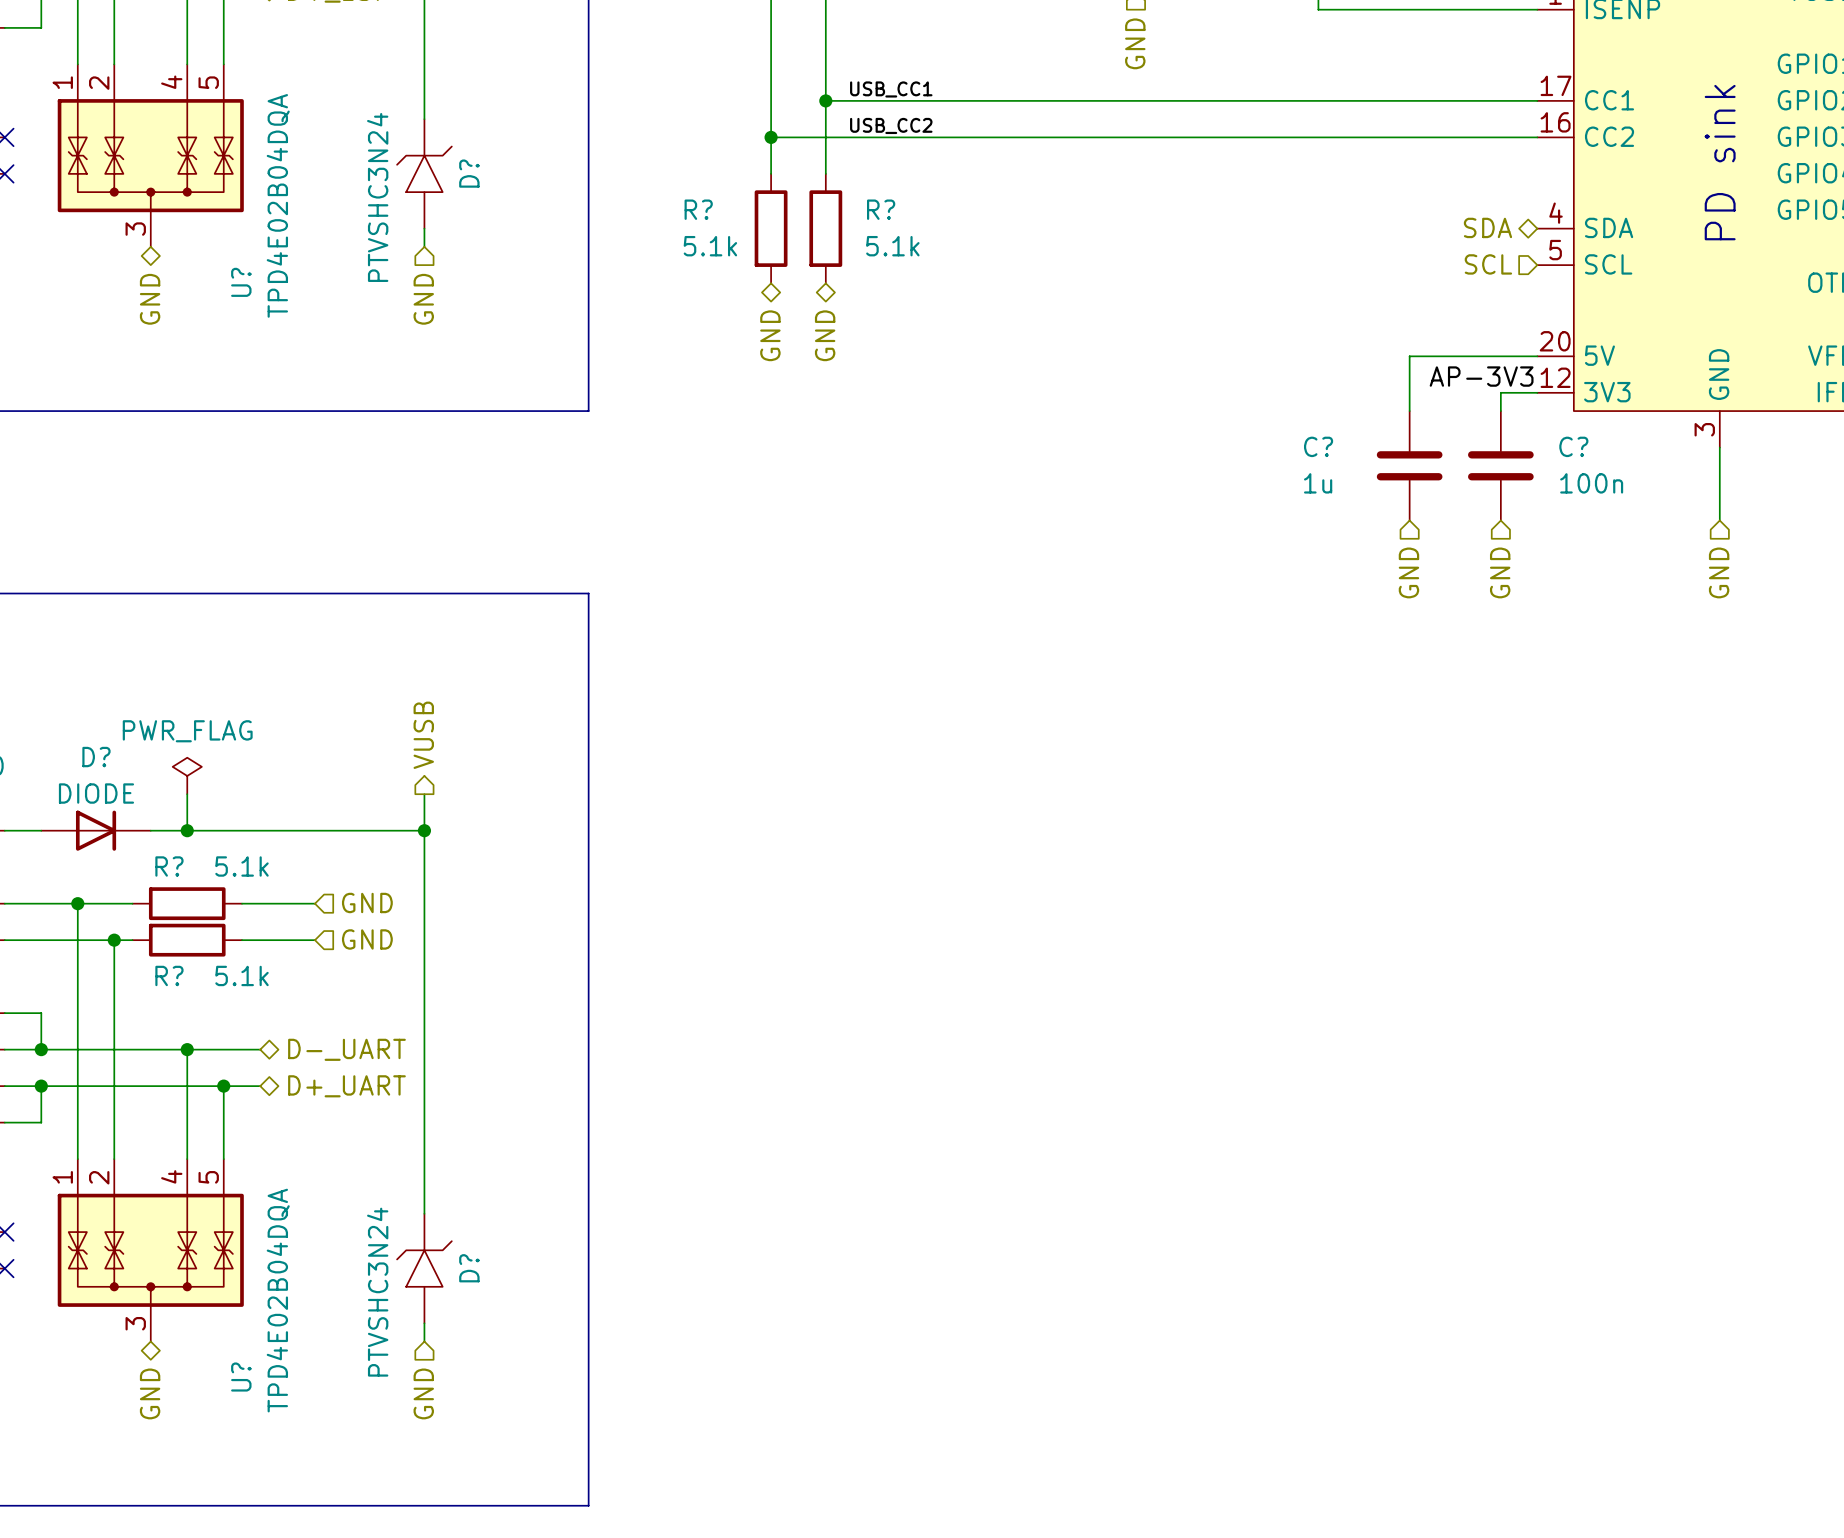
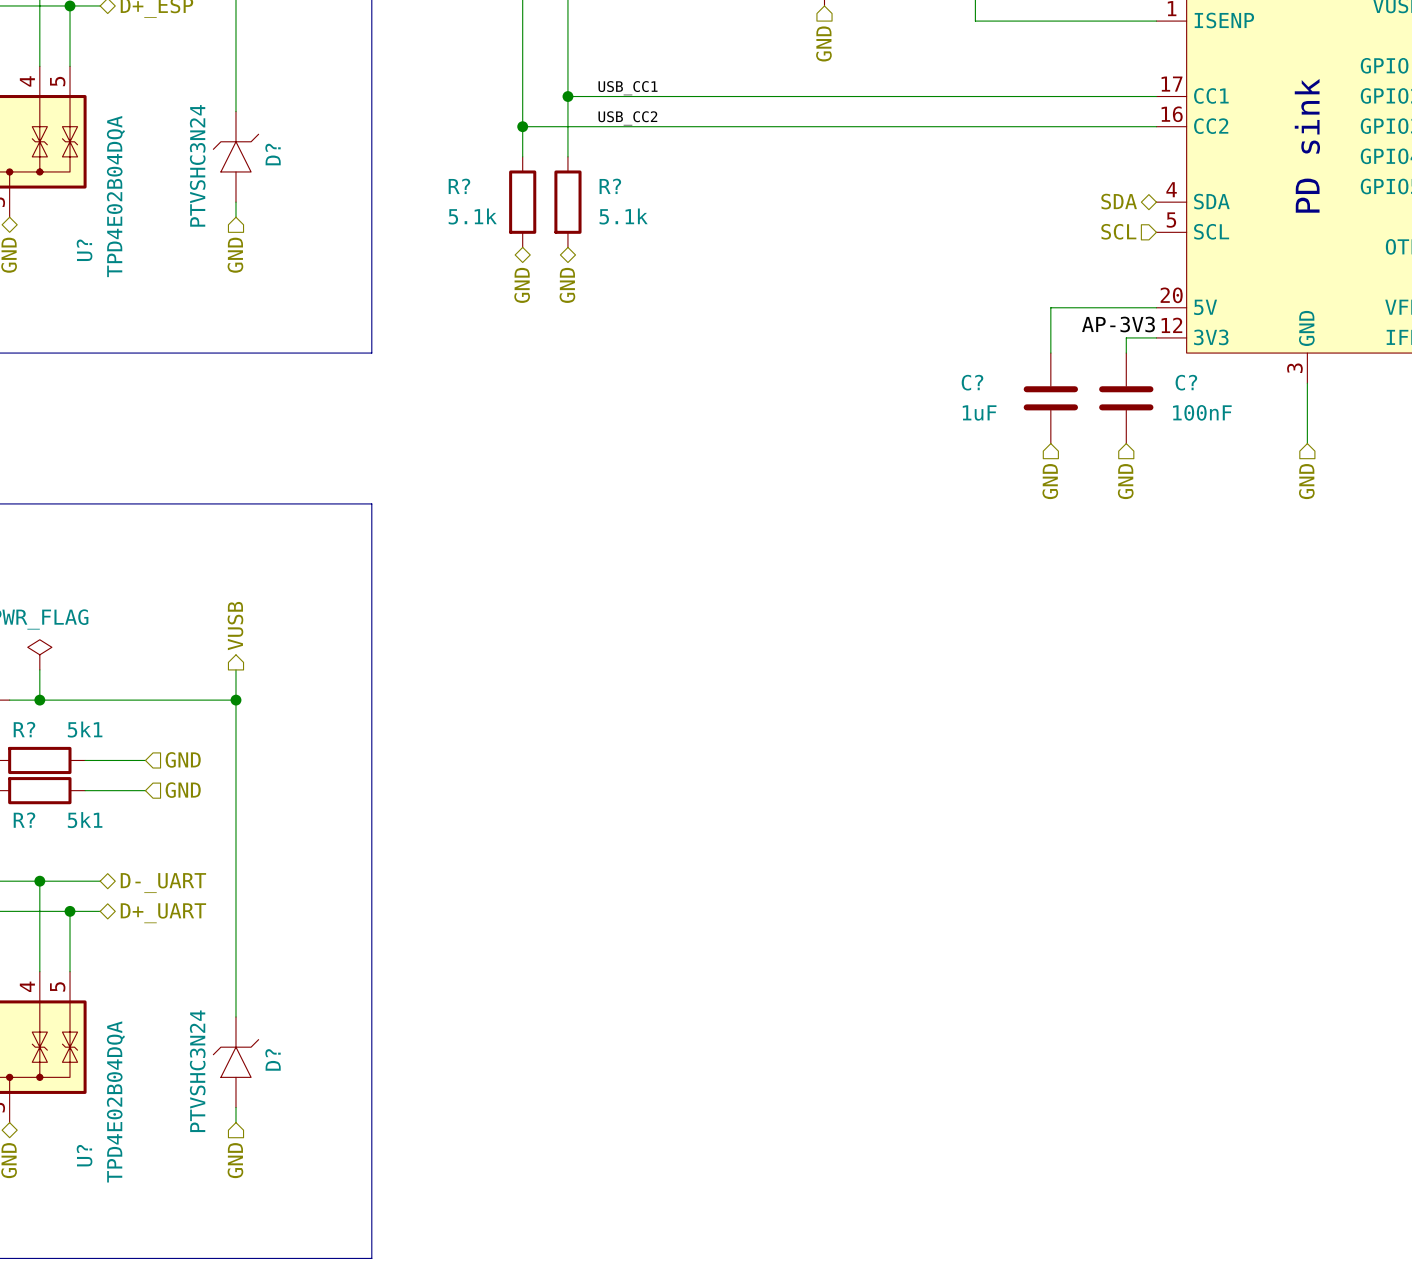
C? value: 1u (1318, 483) -> 1uF (979, 412)
C? value: 100n (1591, 483) -> 100nF (1202, 412)
R? value: 5.1k (241, 866) -> 5k1 (85, 729)
R? value: 5.1k (241, 975) -> 5k1 (85, 820)

